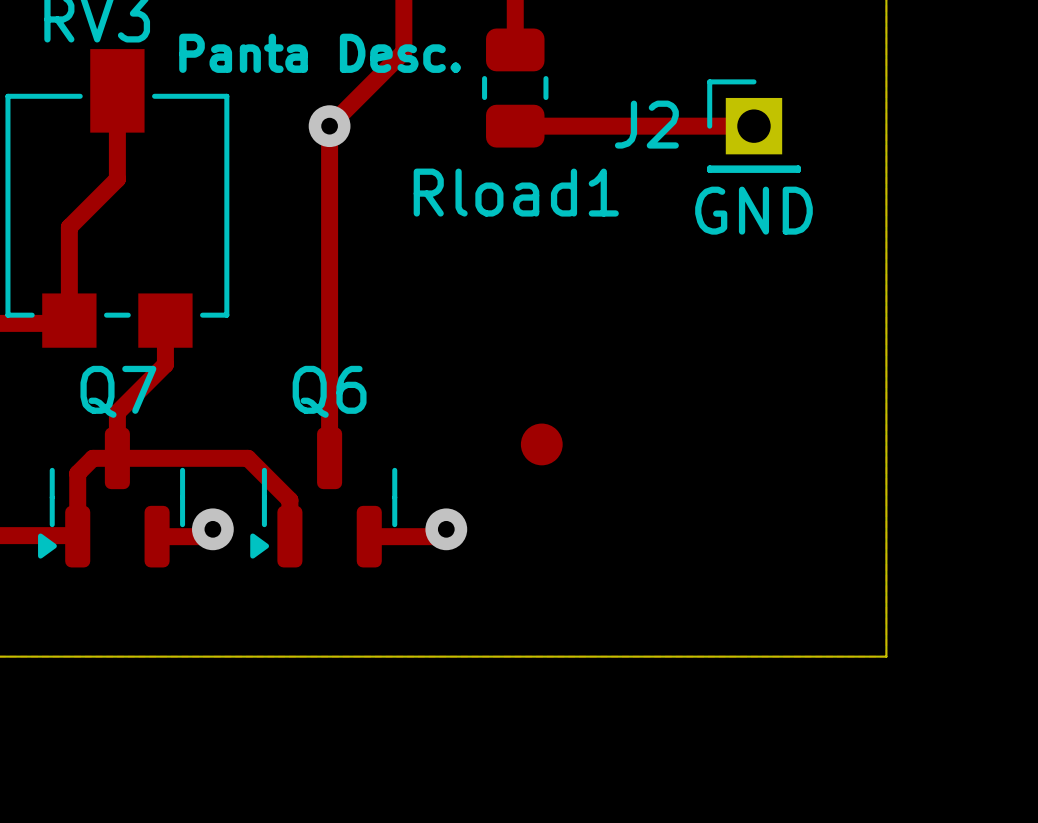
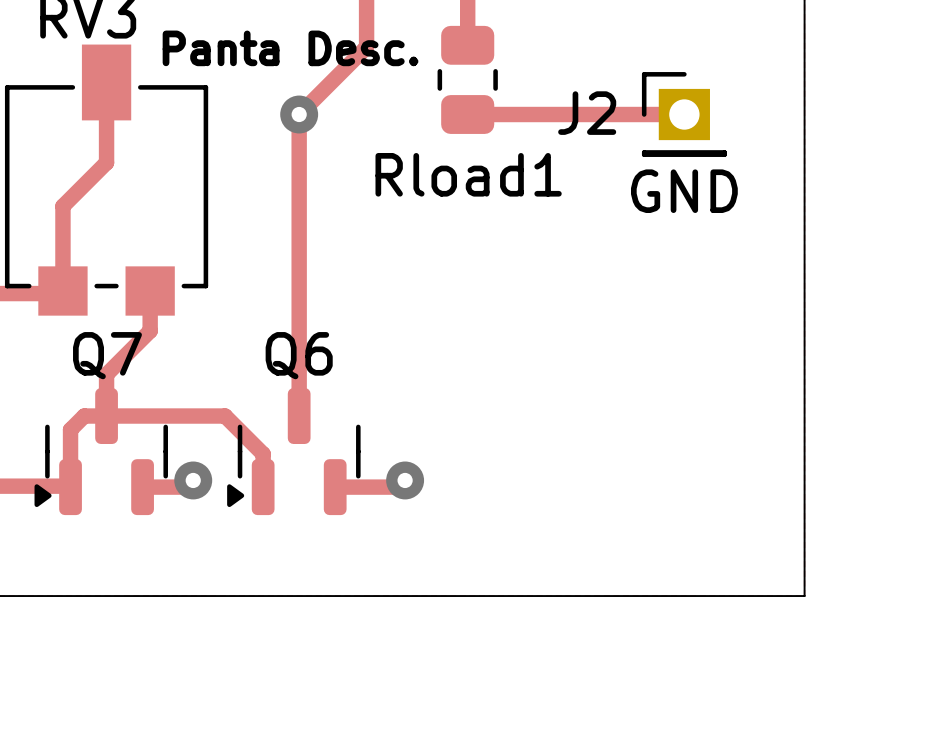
part: (541, 444) -> none

